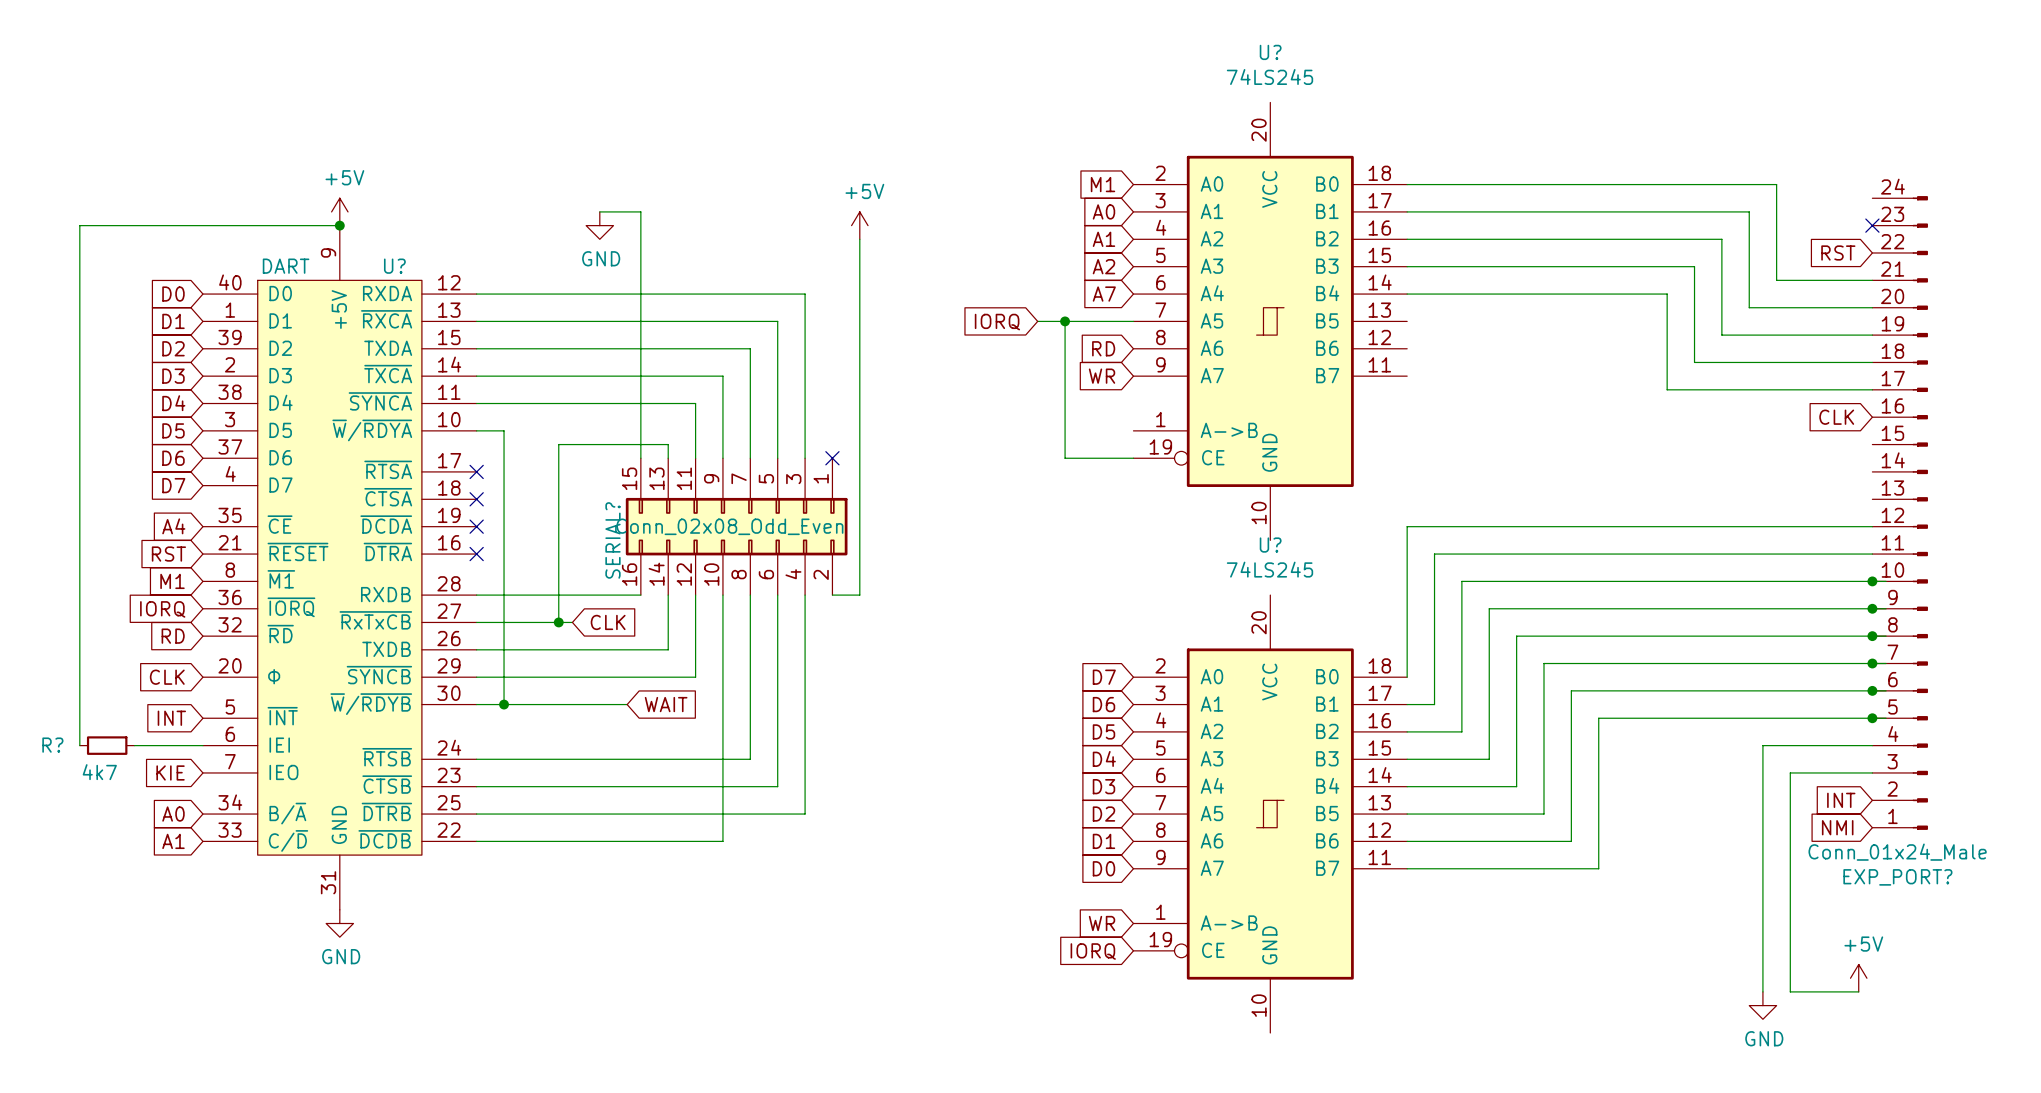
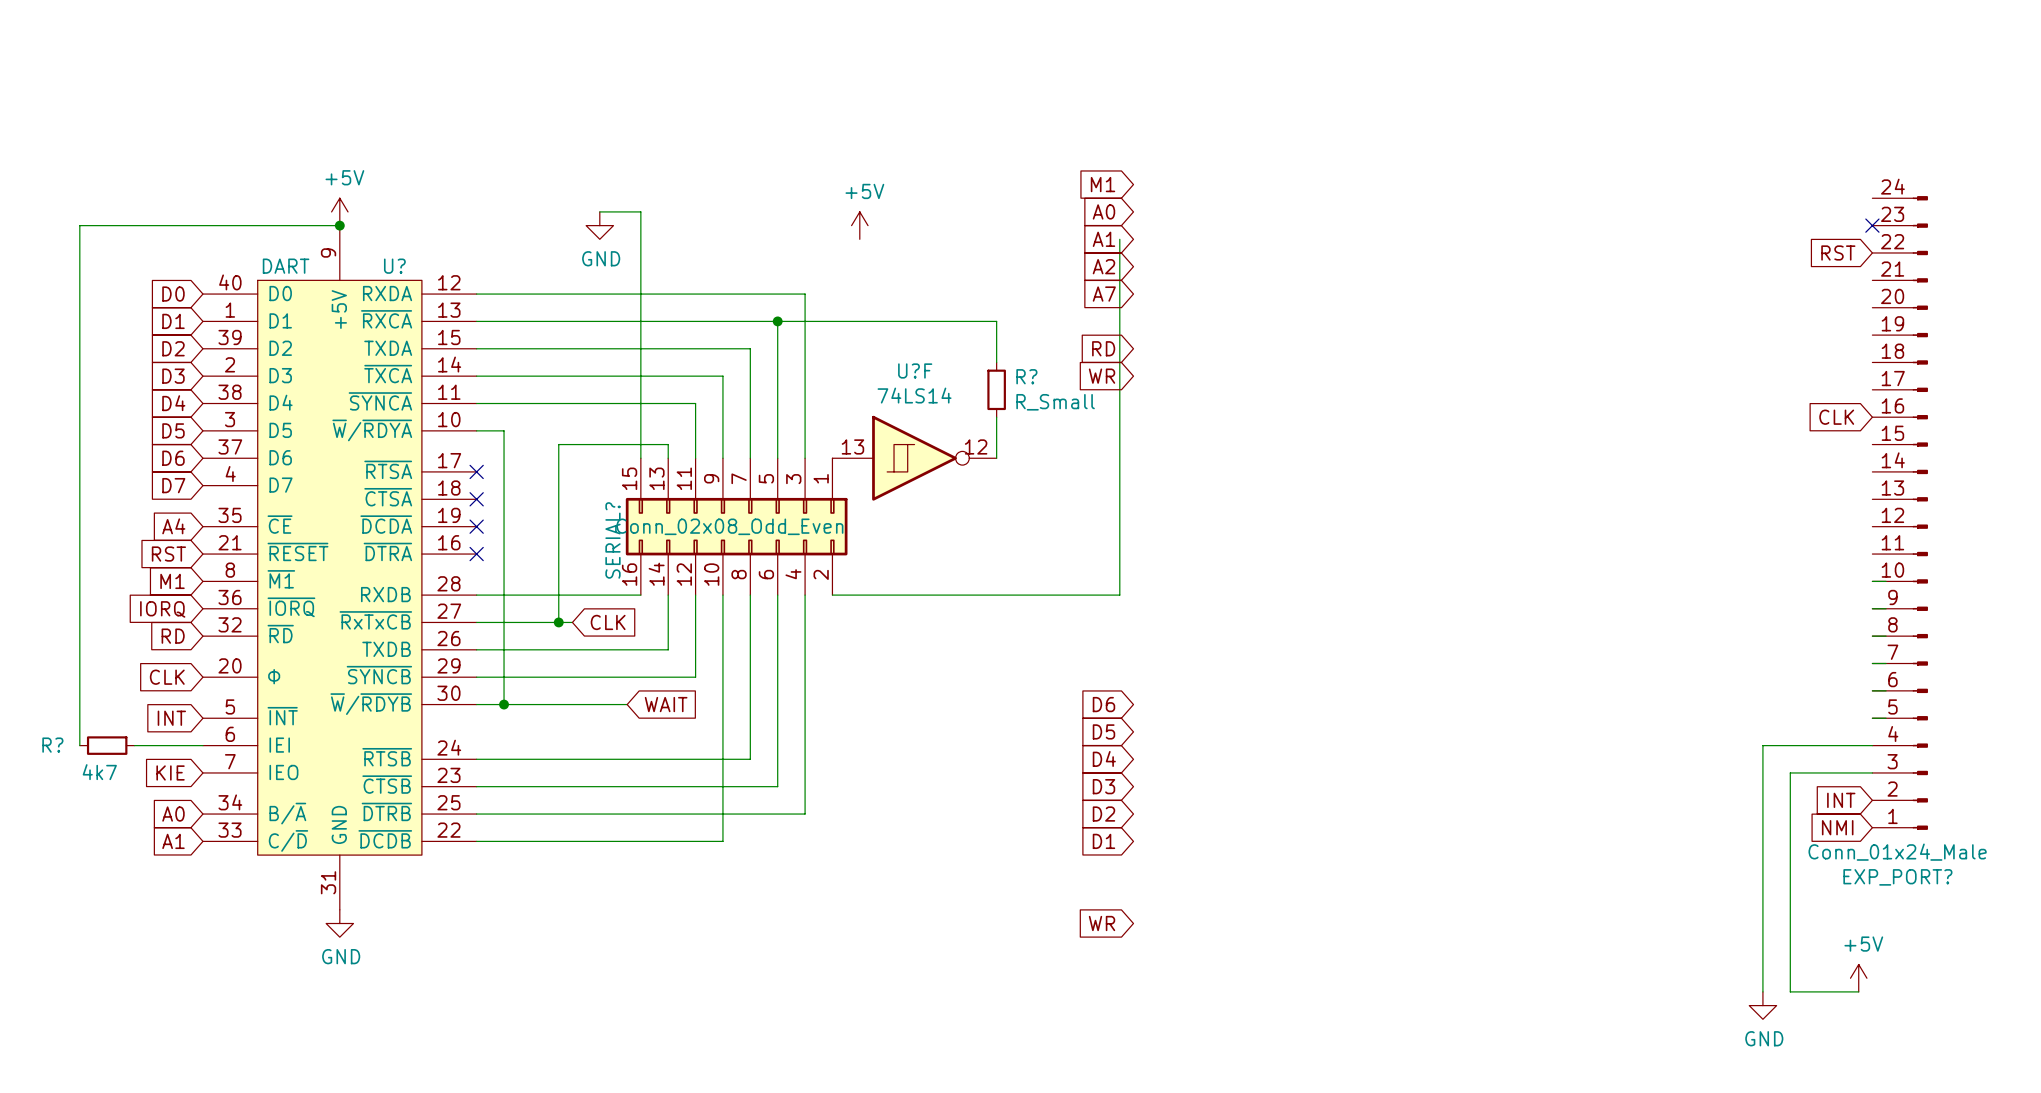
wire: (1407, 184) (1776, 184) (1776, 280) (1872, 280) -> none
wire: (1407, 211) (1749, 211) (1749, 307) (1872, 307) -> none
wire: (859, 239) (859, 595) -> (1119, 239) (1119, 595) (859, 595)
wire: (1407, 239) (1721, 239) (1721, 335) (1872, 335) -> none
wire: (1407, 266) (1694, 266) (1694, 362) (1872, 362) -> none
wire: (1407, 294) (1667, 294) (1667, 389) (1872, 389) -> none
wire: none -> (777, 321) (996, 321) (996, 362)
junction: none -> (777, 321)
wire: (1037, 321) (1133, 321) -> none
wire: (1065, 321) (1065, 458) (1133, 458) -> none
junction: (1065, 321) -> none
U?: 74LS245 (1270, 321) -> none
global label: IORQ (997, 322) -> none
R?: none -> R_Small (996, 389)
wire: none -> (996, 417) (996, 458)
no-connect mark: (832, 458) -> none
U?F: none -> 74LS14 (914, 458)
wire: (1872, 526) (1407, 526) (1407, 677) -> none
wire: (1872, 554) (1434, 554) (1434, 704) (1407, 704) -> none
wire: (1872, 581) (1461, 581) (1461, 731) (1407, 731) -> none
junction: (1872, 581) -> none
wire: (1872, 608) (1489, 608) (1489, 759) (1407, 759) -> none
junction: (1872, 608) -> none
wire: (1872, 636) (1516, 636) (1516, 786) (1407, 786) -> none
junction: (1872, 636) -> none
wire: (1872, 663) (1543, 663) (1543, 814) (1407, 814) -> none
junction: (1872, 663) -> none
global label: D7 (1104, 677) -> none
wire: (1872, 690) (1571, 690) (1571, 841) (1407, 841) -> none
junction: (1872, 690) -> none
wire: (1872, 718) (1598, 718) (1598, 868) (1407, 868) -> none
junction: (1872, 718) -> none
U?: 74LS245 (1270, 814) -> none
global label: D0 (1103, 868) -> none
global label: IORQ (1093, 951) -> none

